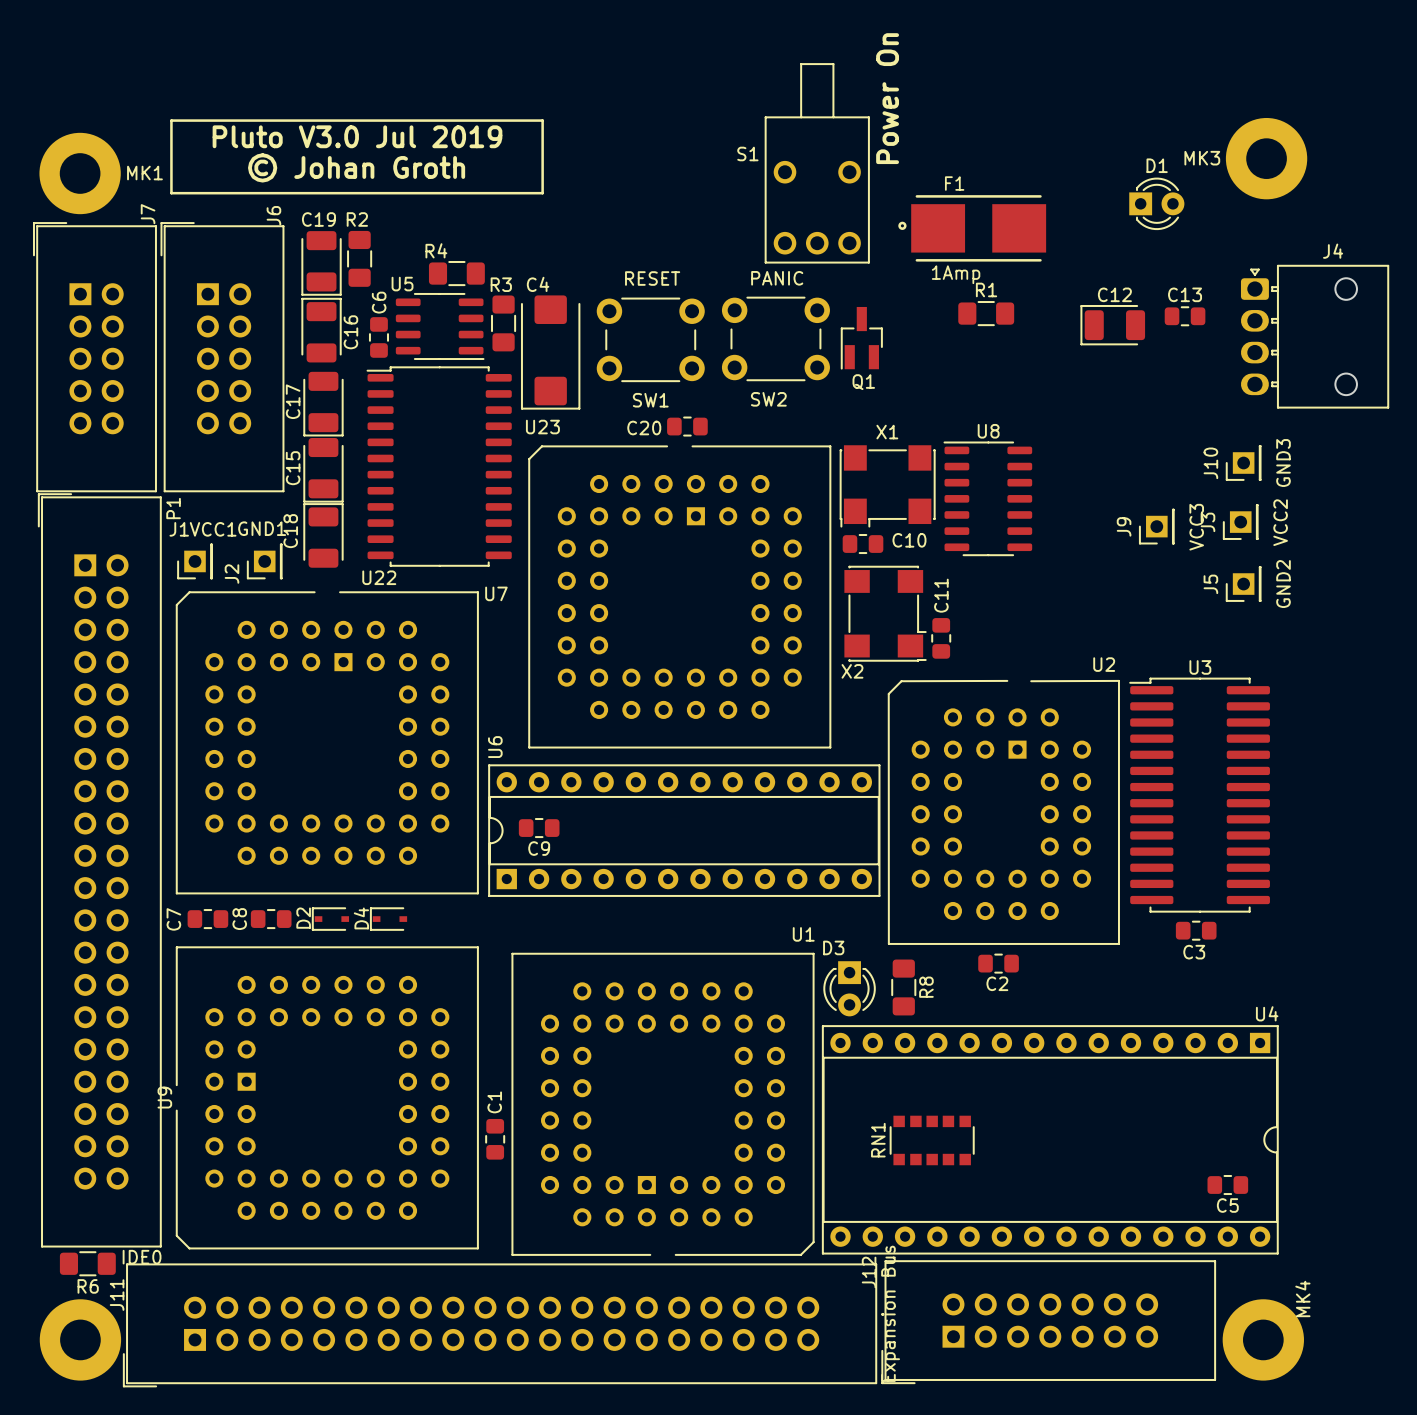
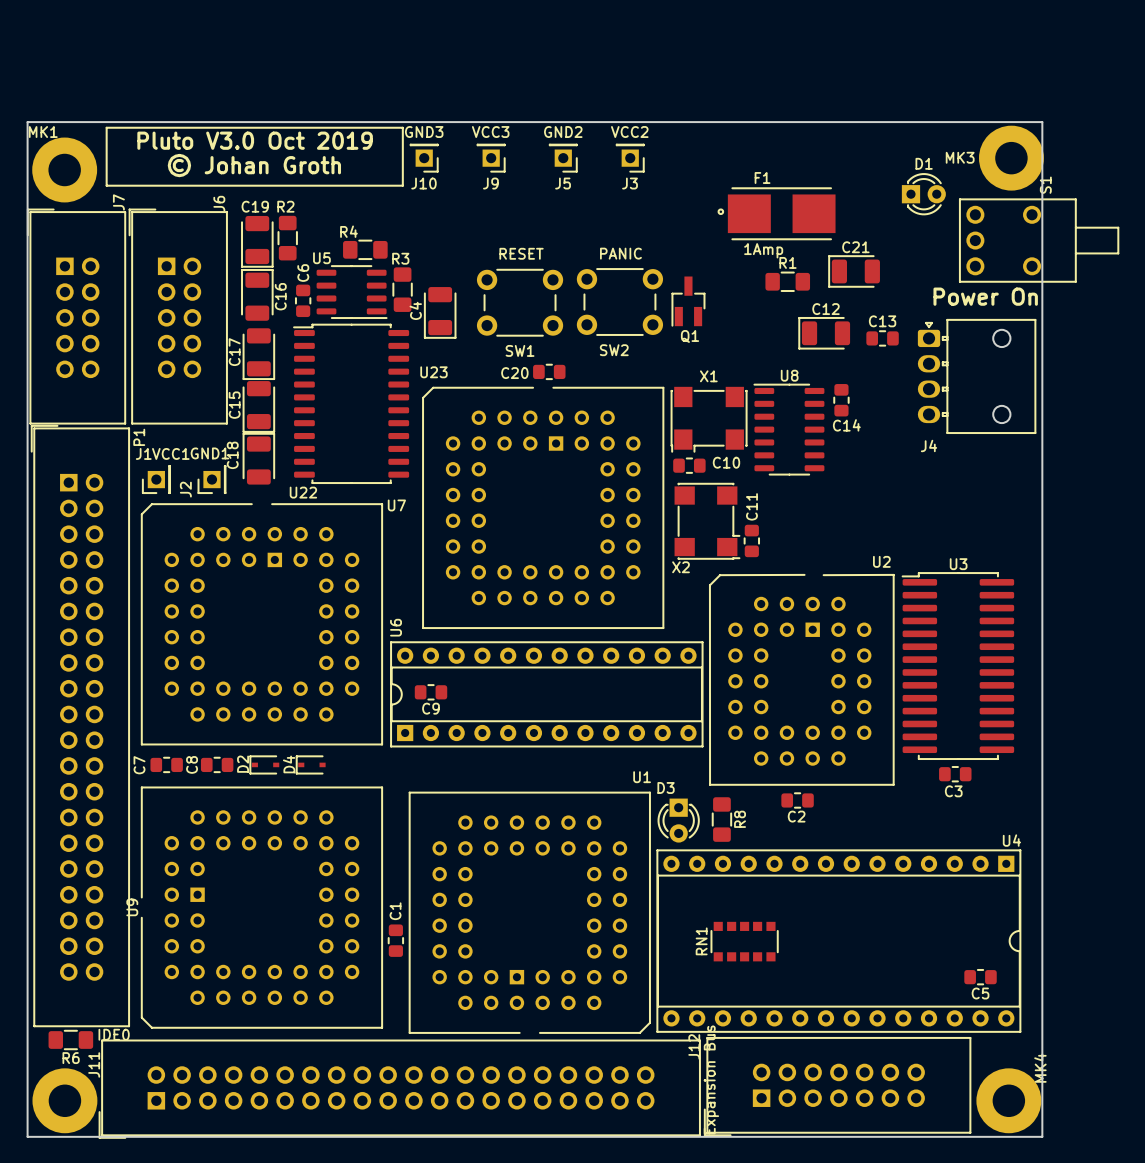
text: Power On (887, 98) -> none
board edge: none -> (27, 122) (27, 1136) (1042, 1136) (1042, 122) (27, 122)
line: (171, 120) (171, 193) -> (137, 127) (106, 127) (106, 185) (137, 185)
line: (503, 120) (542, 120) (542, 193) (503, 193) -> (402, 127) (402, 185)
text: Pluto V3.0 Jul 2019 (357, 136) -> Pluto V3.0 Oct 2019 (255, 140)
S1 rotation: 0° (817, 163) -> 90° clockwise (1039, 240)
S1 position: (817, 163) -> (1039, 240)
text position: © Johan Groth (356, 167) -> © Johan Groth (254, 165)
MK1 name position: MK1 (144, 173) -> MK1 (43, 132)
J4 name position: J4 (1333, 251) -> J4 (929, 445)
C4 name position: C4 (538, 284) -> C4 (415, 310)
C4 footprint: [521, 295, 581, 410] -> [424, 287, 457, 339]
C21: none -> (854, 271)
C13 position: (1185, 316) -> (882, 338)
C12 position: (1112, 325) -> (824, 333)
text: none -> Power On (985, 296)
J4 position: (1314, 336) -> (976, 376)
C14: none -> (841, 400)
J10 rotation: 0° (1243, 463) -> 90° counterclockwise (424, 158)
J10 position: (1243, 463) -> (424, 158)
J3 rotation: 0° (1240, 522) -> 90° counterclockwise (630, 158)
J3 position: (1240, 522) -> (630, 158)
J9 rotation: 0° (1156, 526) -> 90° counterclockwise (491, 158)
J9 position: (1156, 526) -> (491, 158)
J5 rotation: 0° (1243, 584) -> 90° counterclockwise (563, 158)
J5 position: (1243, 584) -> (563, 158)

